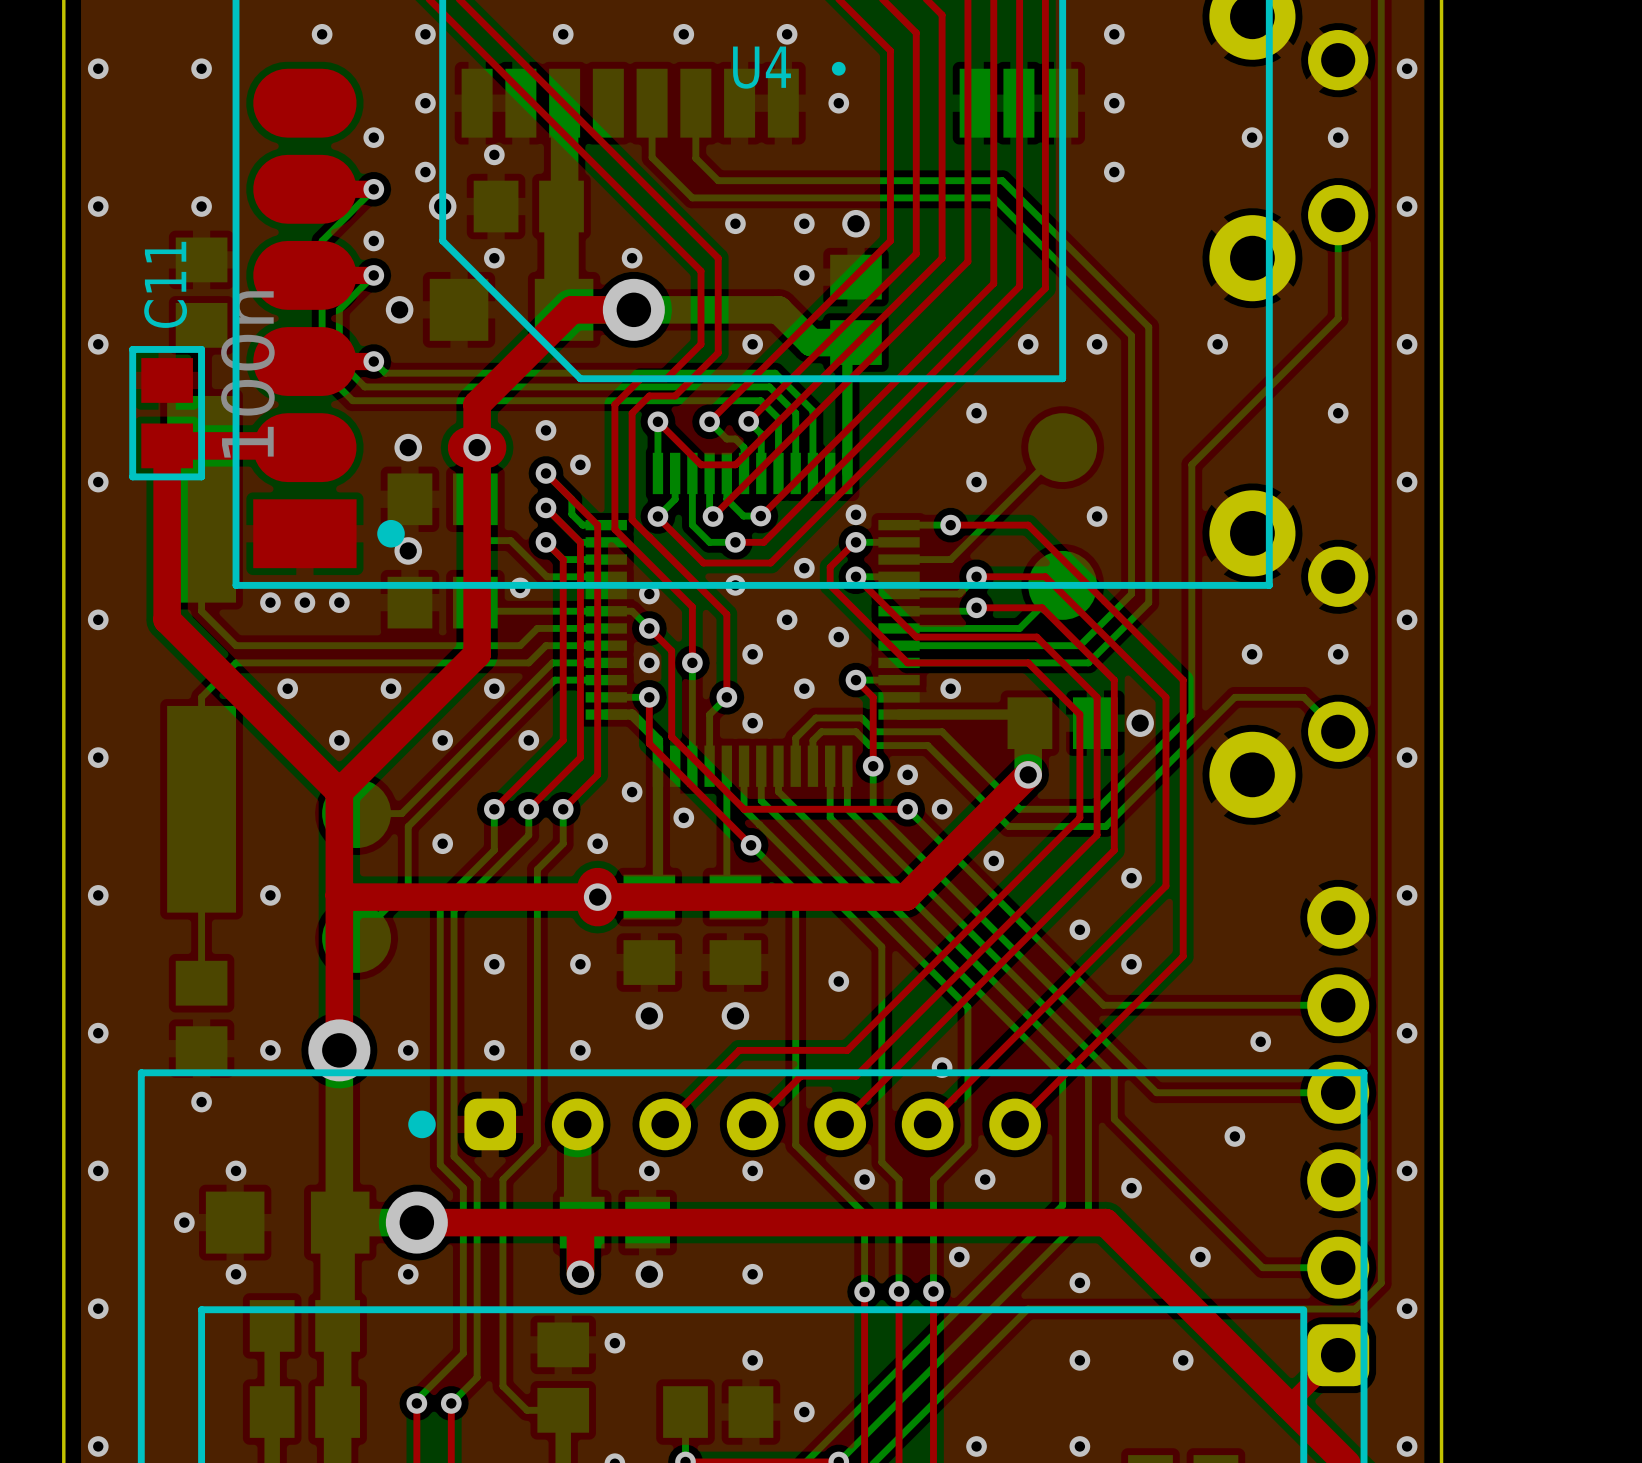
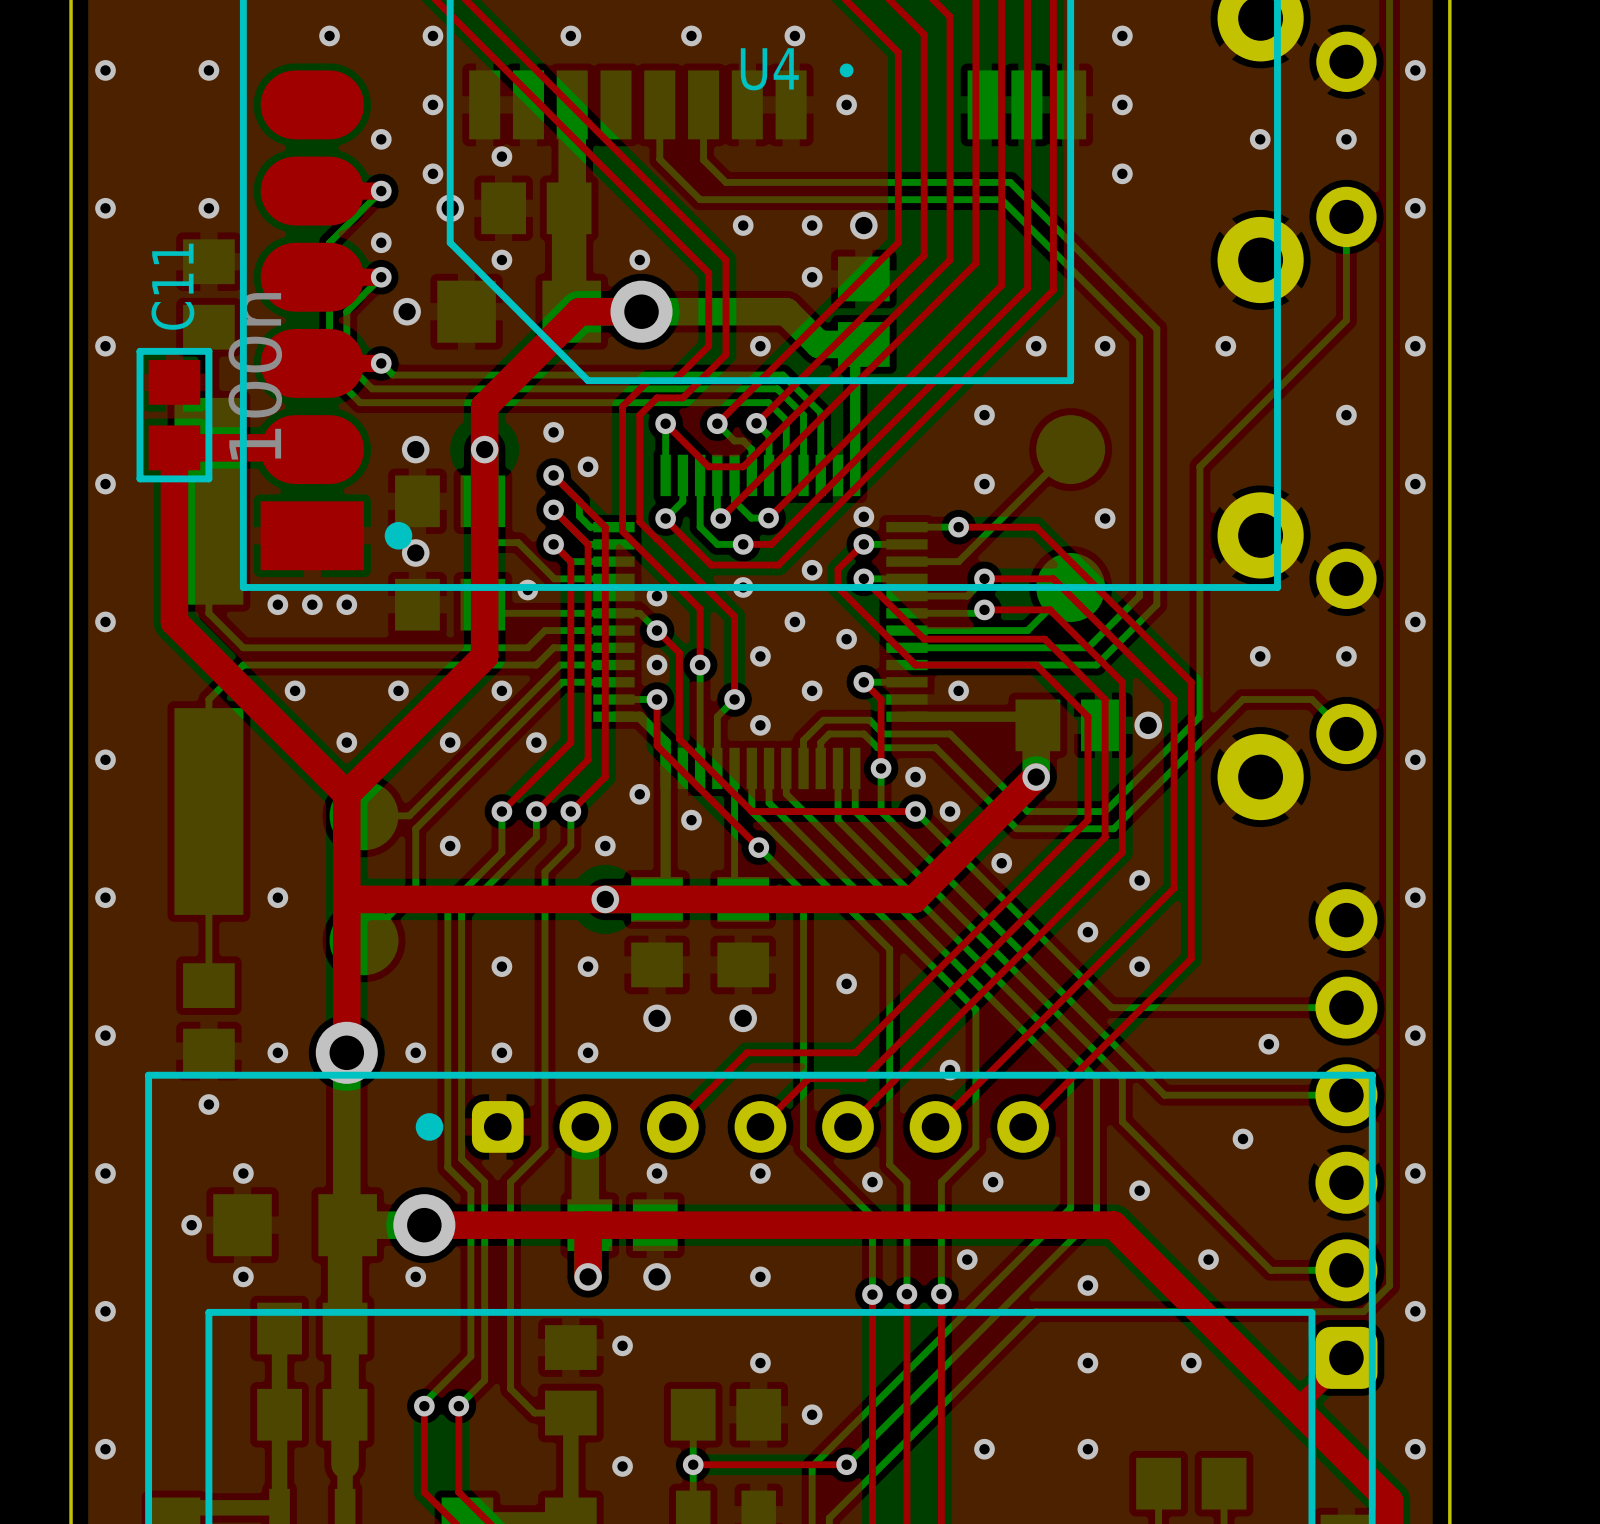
top track: (468, 447) (485, 447) -> none
top track: (597, 888) (597, 905) -> none

